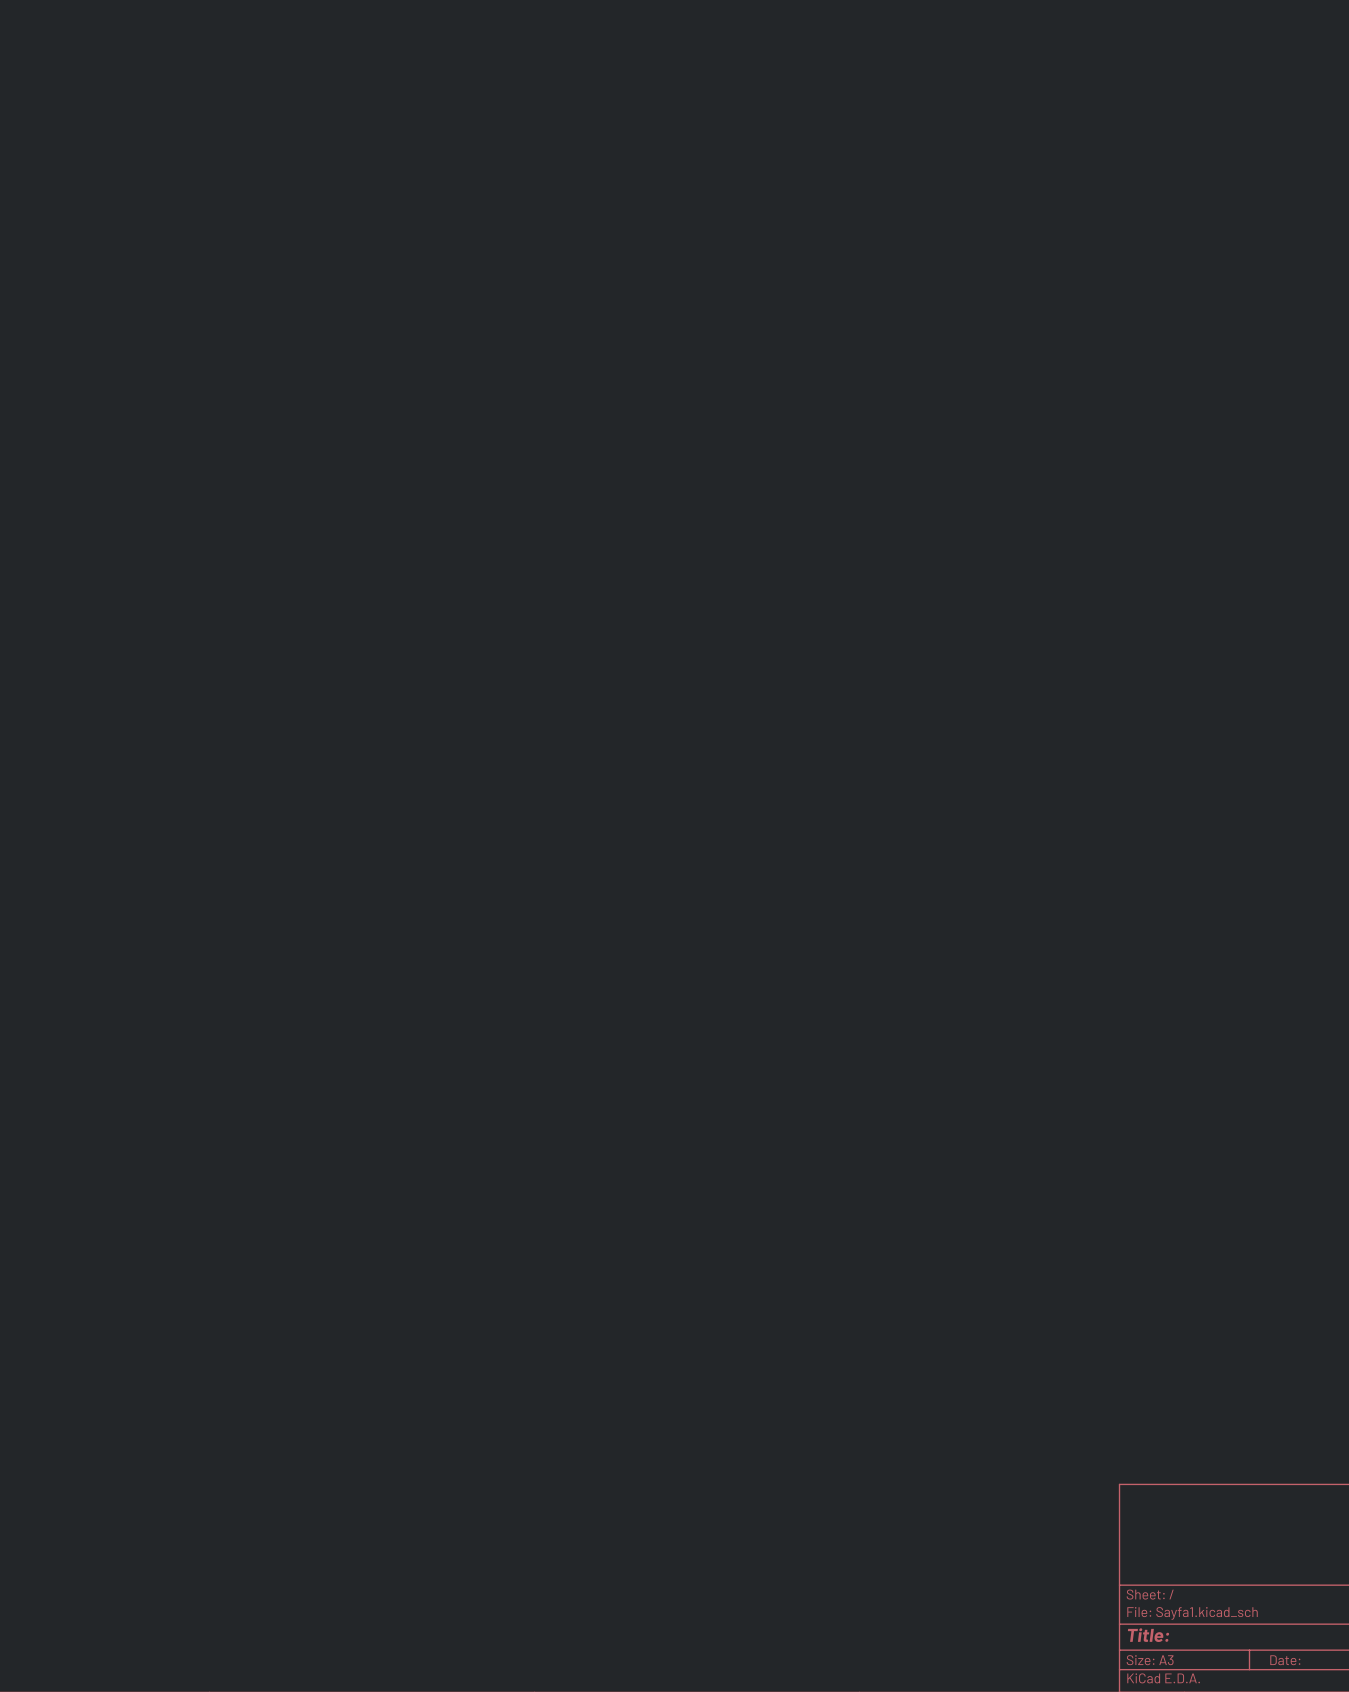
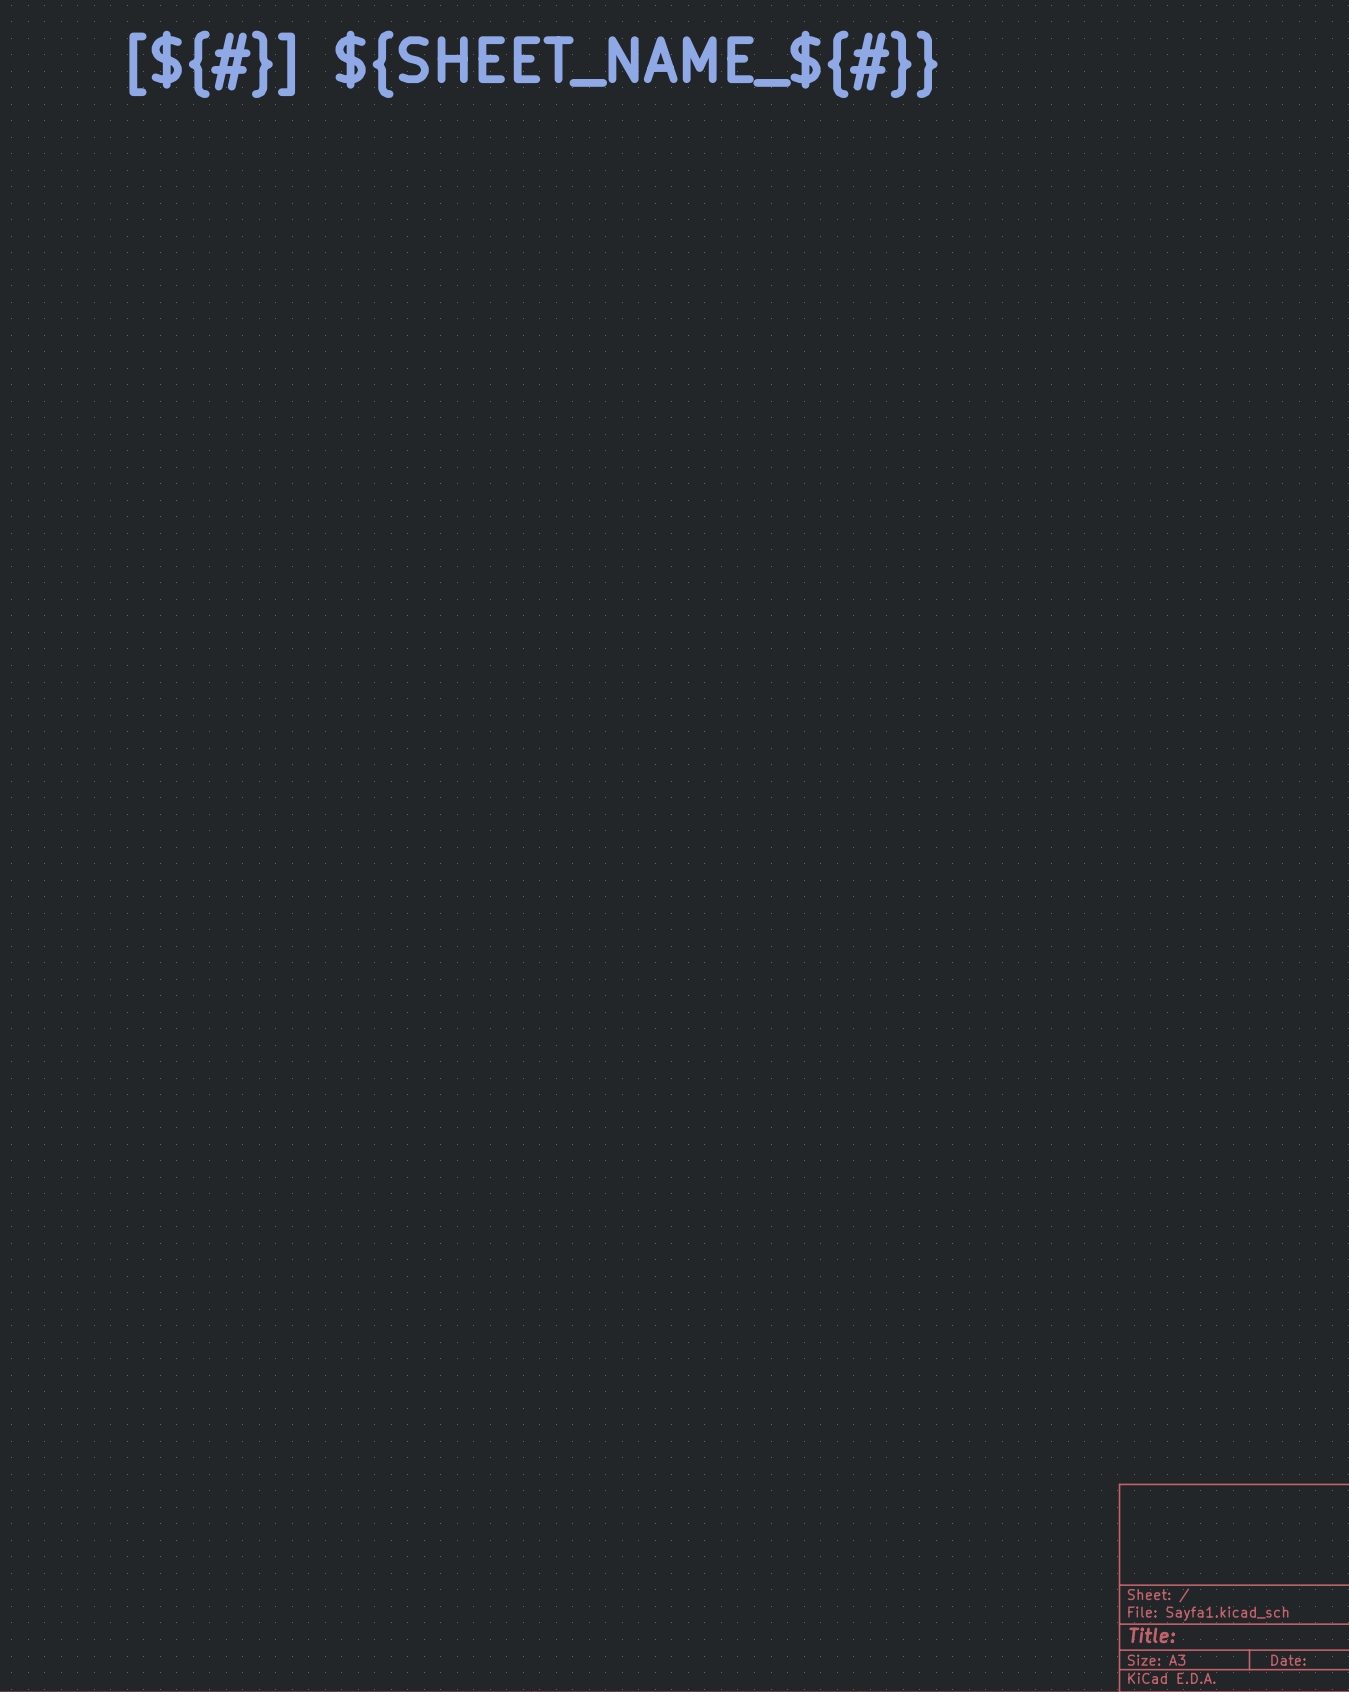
text: none -> [${#}] ${SHEET_NAME_${#}} (533, 64)

